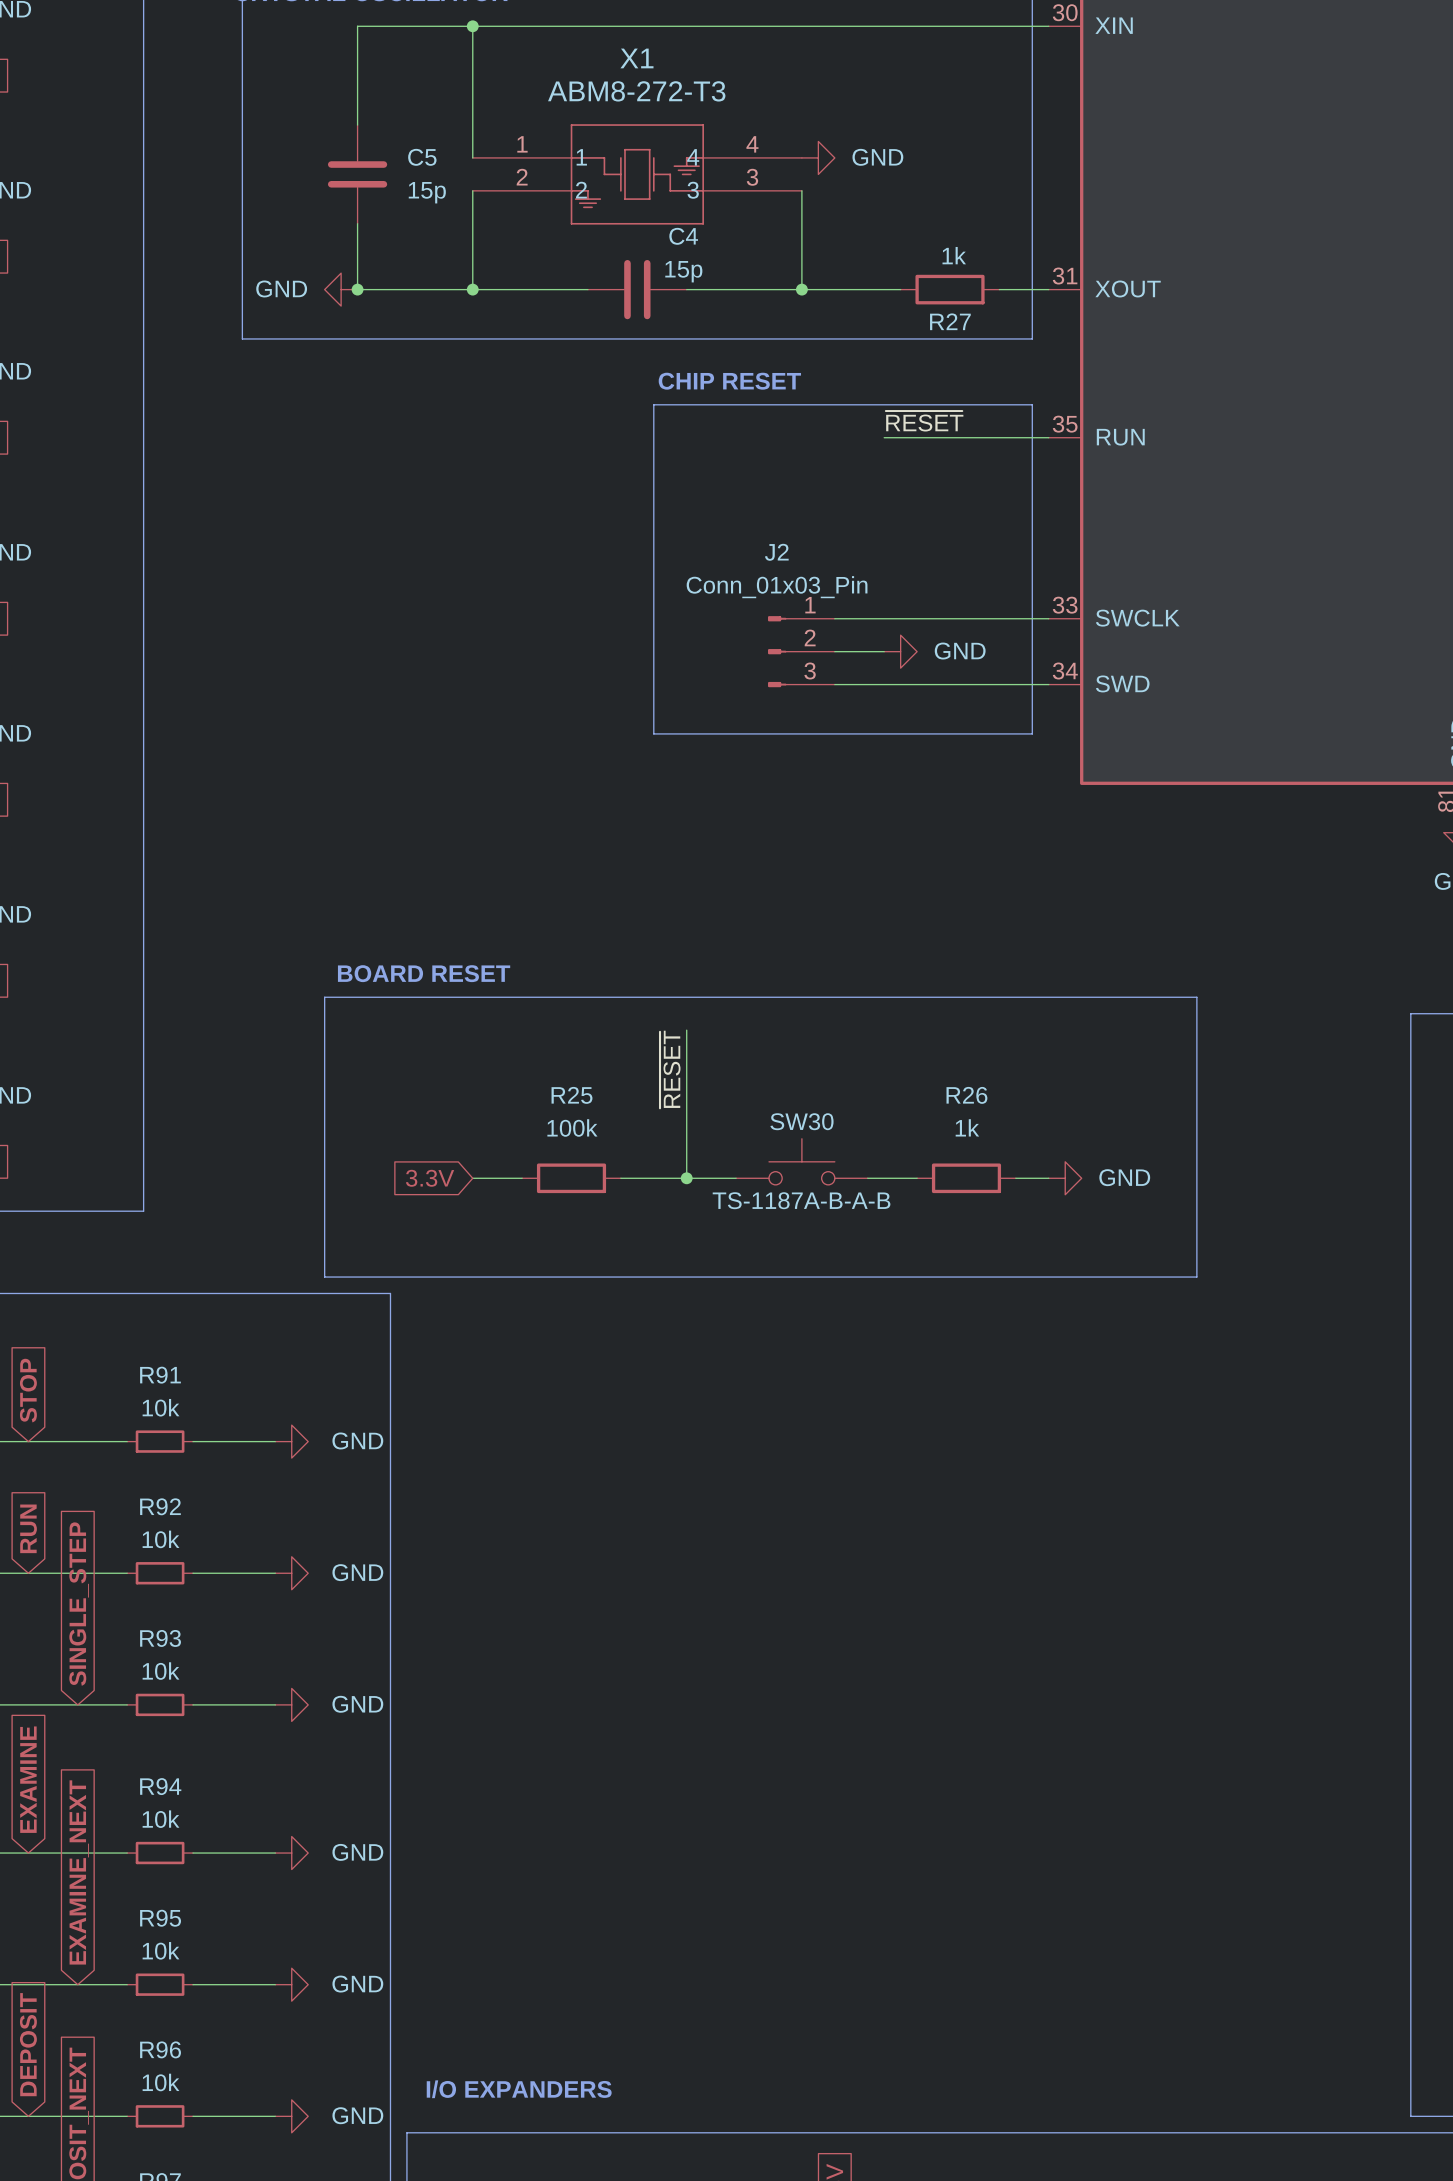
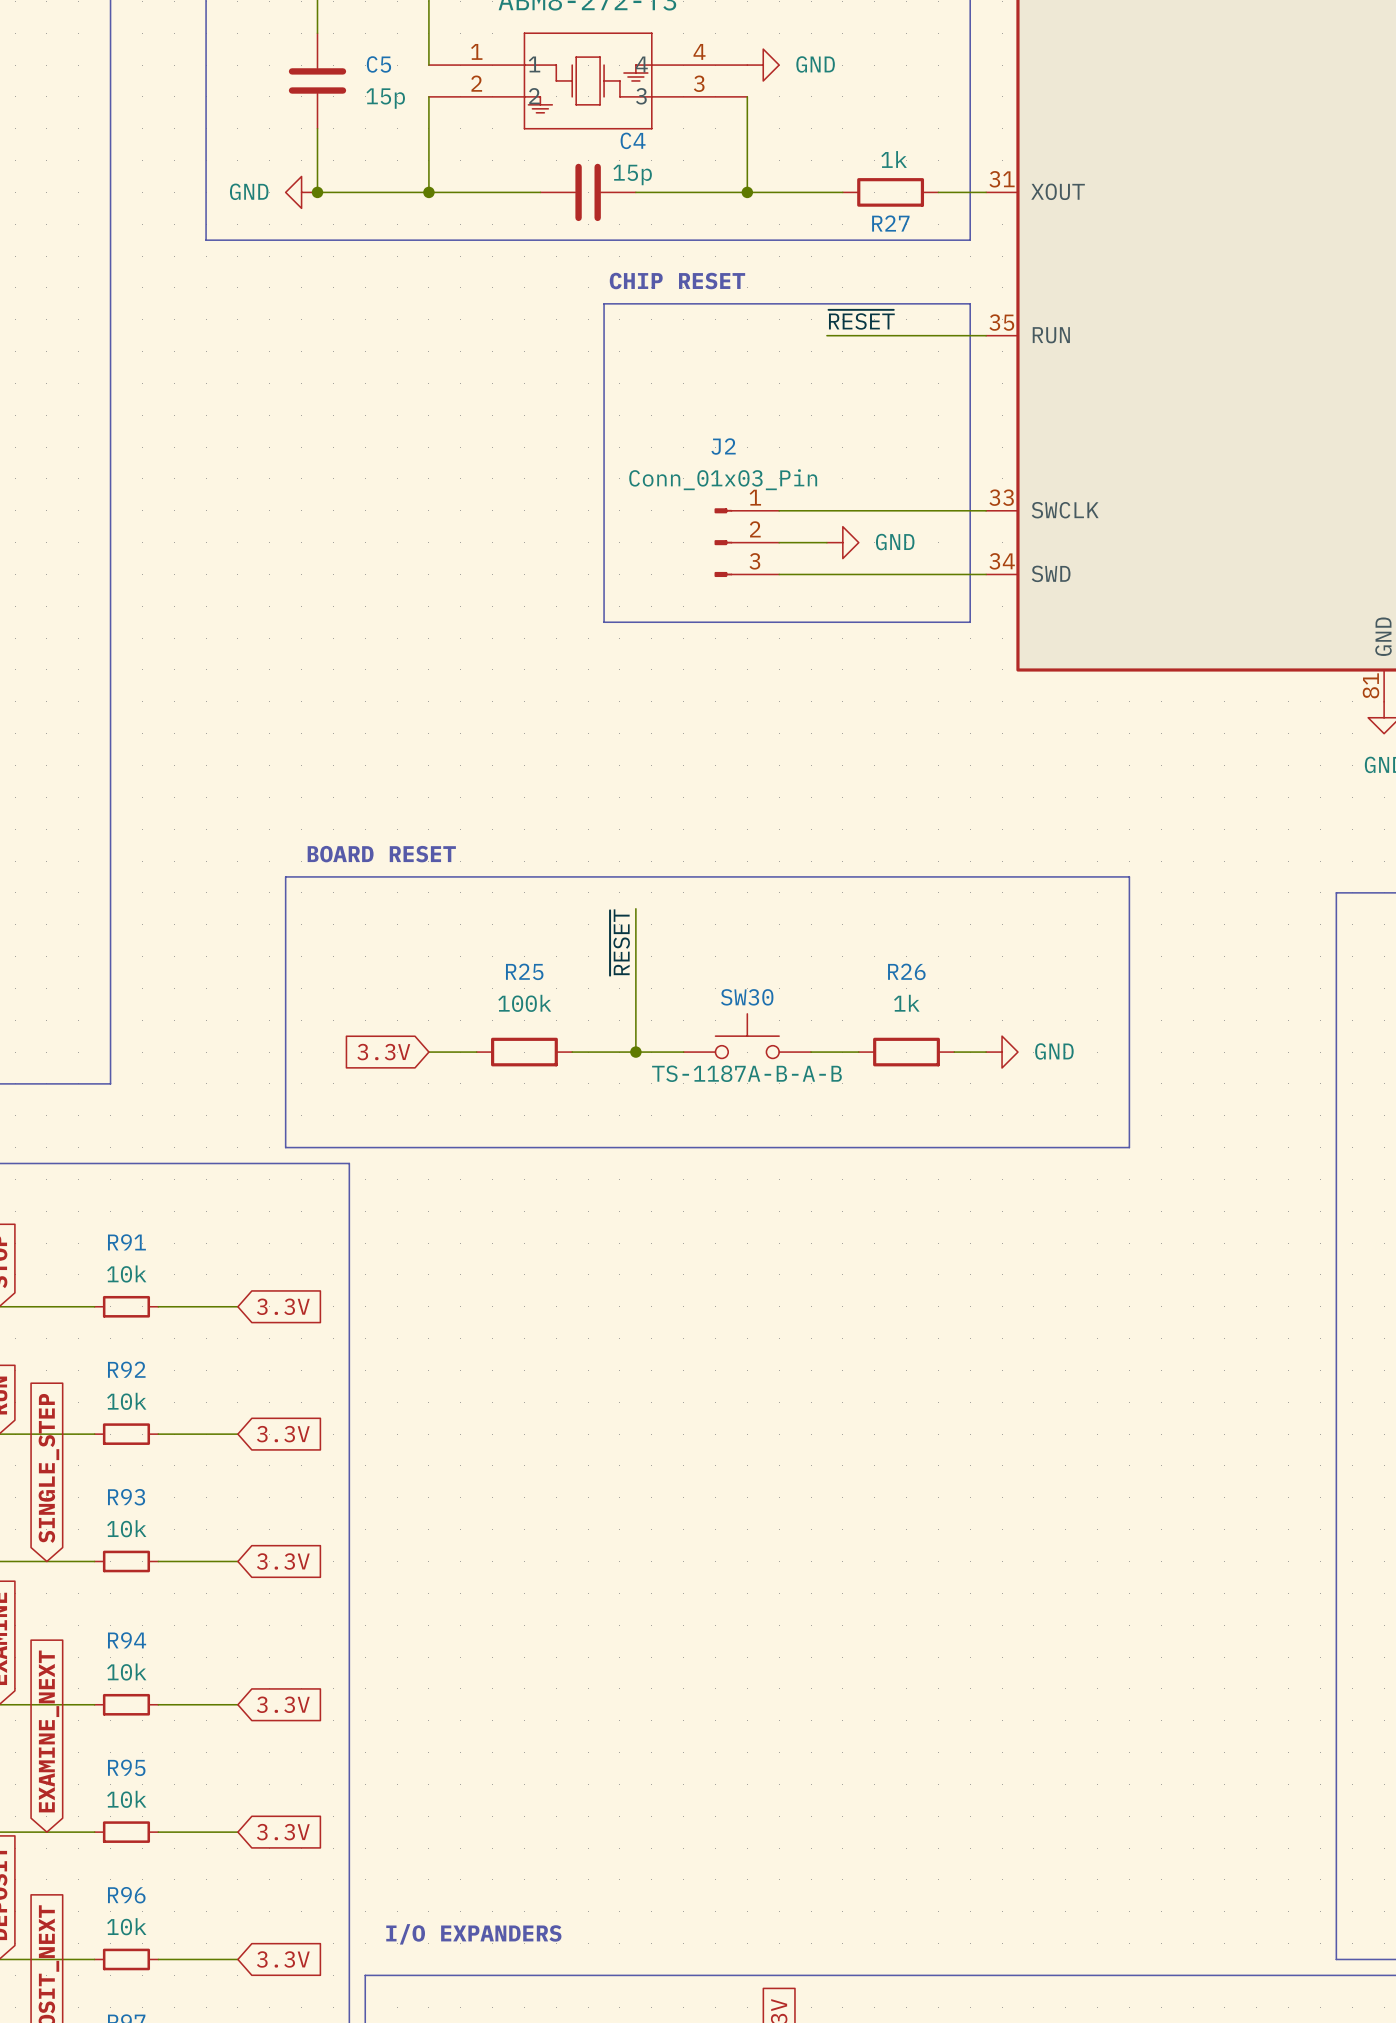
power symbol: GND (291, 1441) -> none
global label: none -> 3.3V (283, 1306)
power symbol: GND (291, 1573) -> none
global label: none -> 3.3V (283, 1434)
power symbol: GND (291, 1704) -> none
global label: none -> 3.3V (283, 1561)
power symbol: GND (291, 1853) -> none
global label: none -> 3.3V (283, 1704)
power symbol: GND (291, 1984) -> none
global label: none -> 3.3V (283, 1832)
power symbol: GND (291, 2116) -> none
global label: none -> 3.3V (283, 1959)

